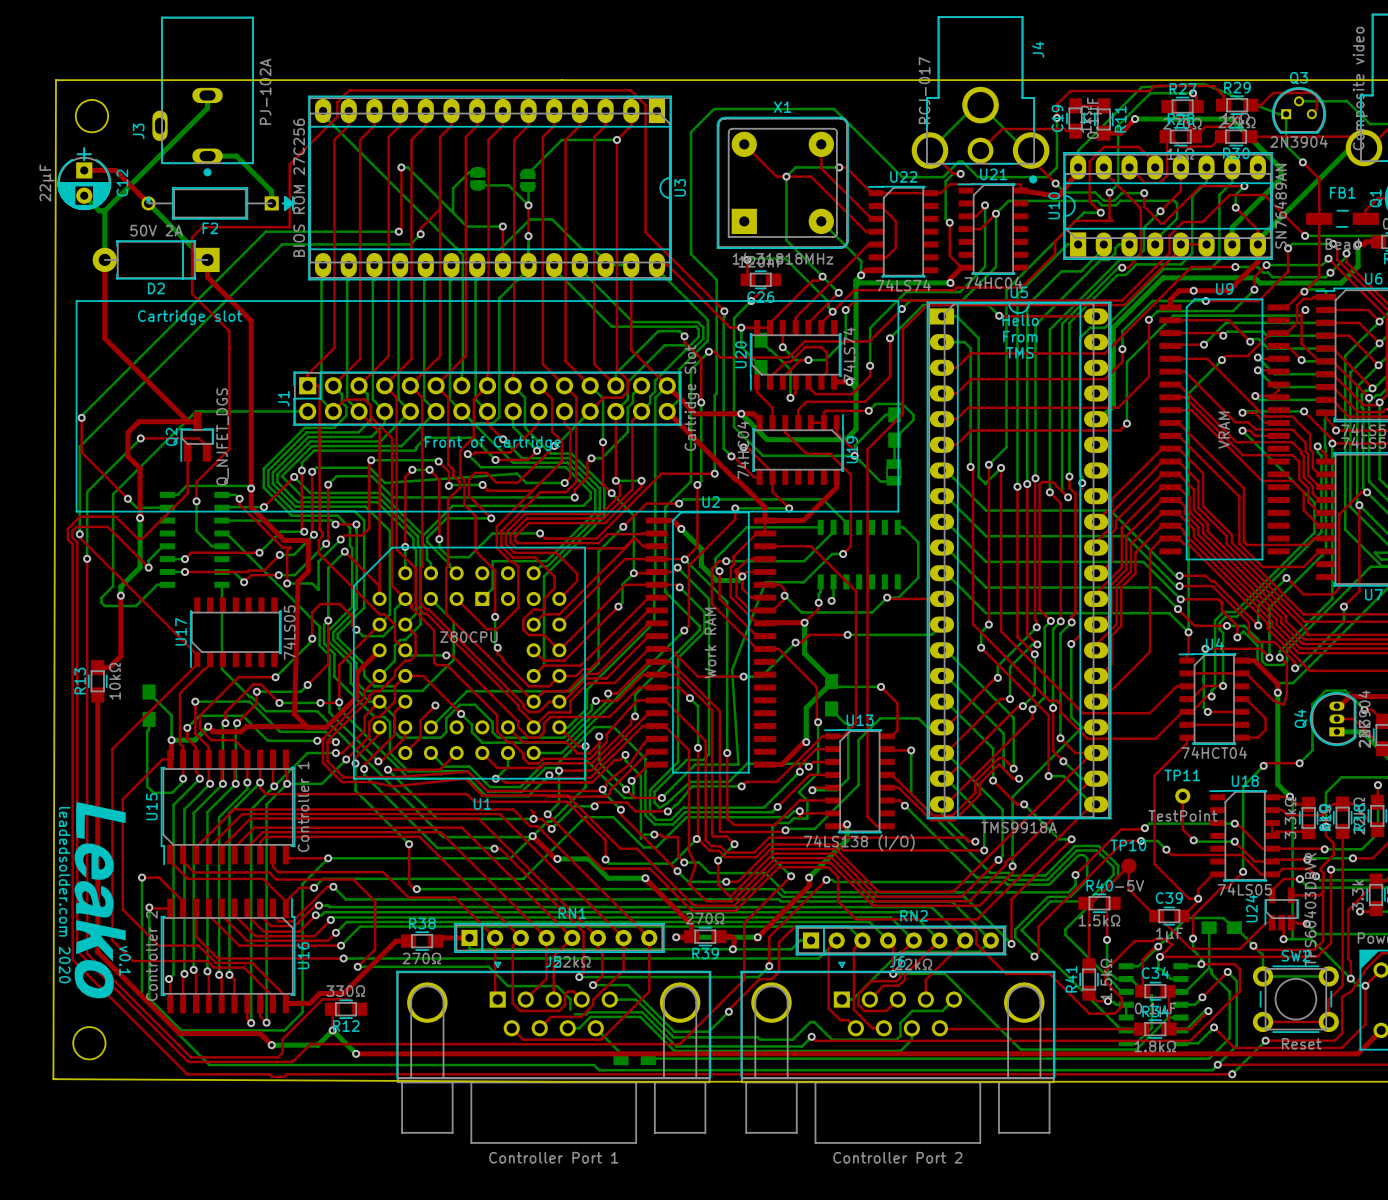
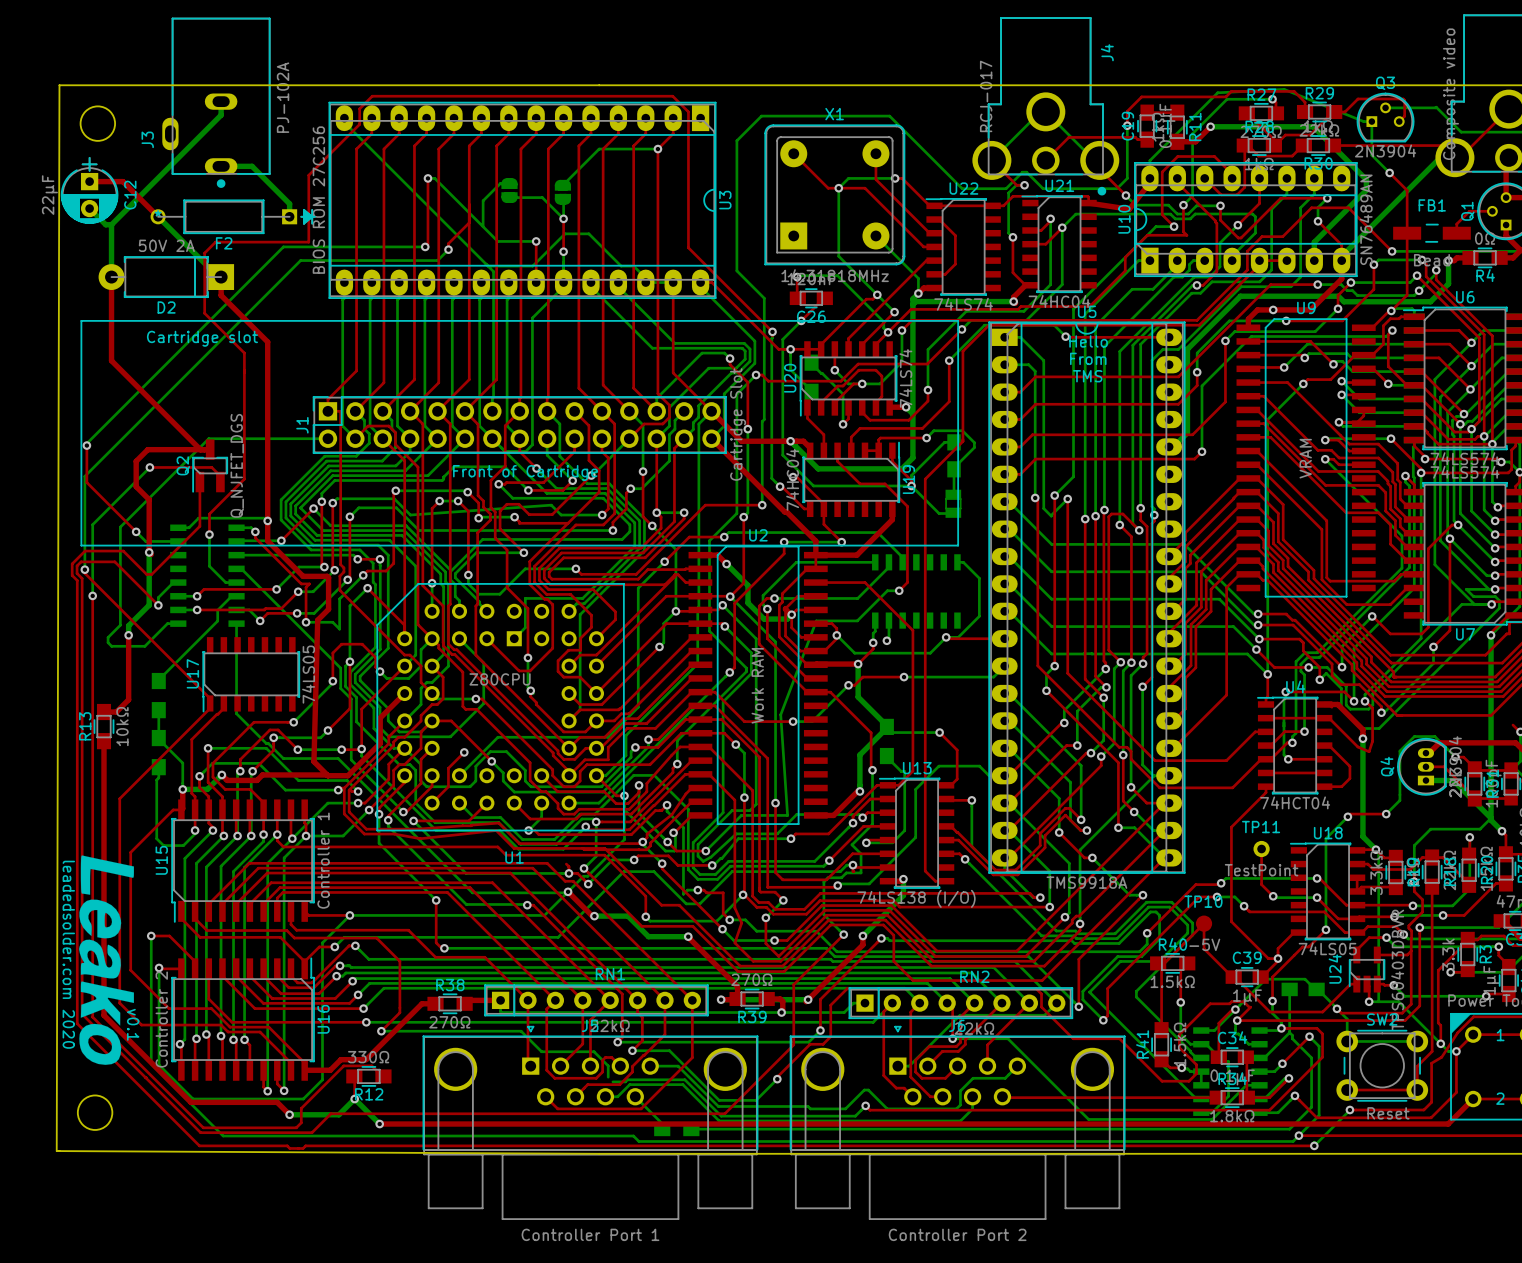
bottom track: none -> (236, 596) (231, 596) (217, 610) (217, 621) (158, 681)
part: none -> (158, 695)
bottom track: none -> (158, 710) (158, 738)

